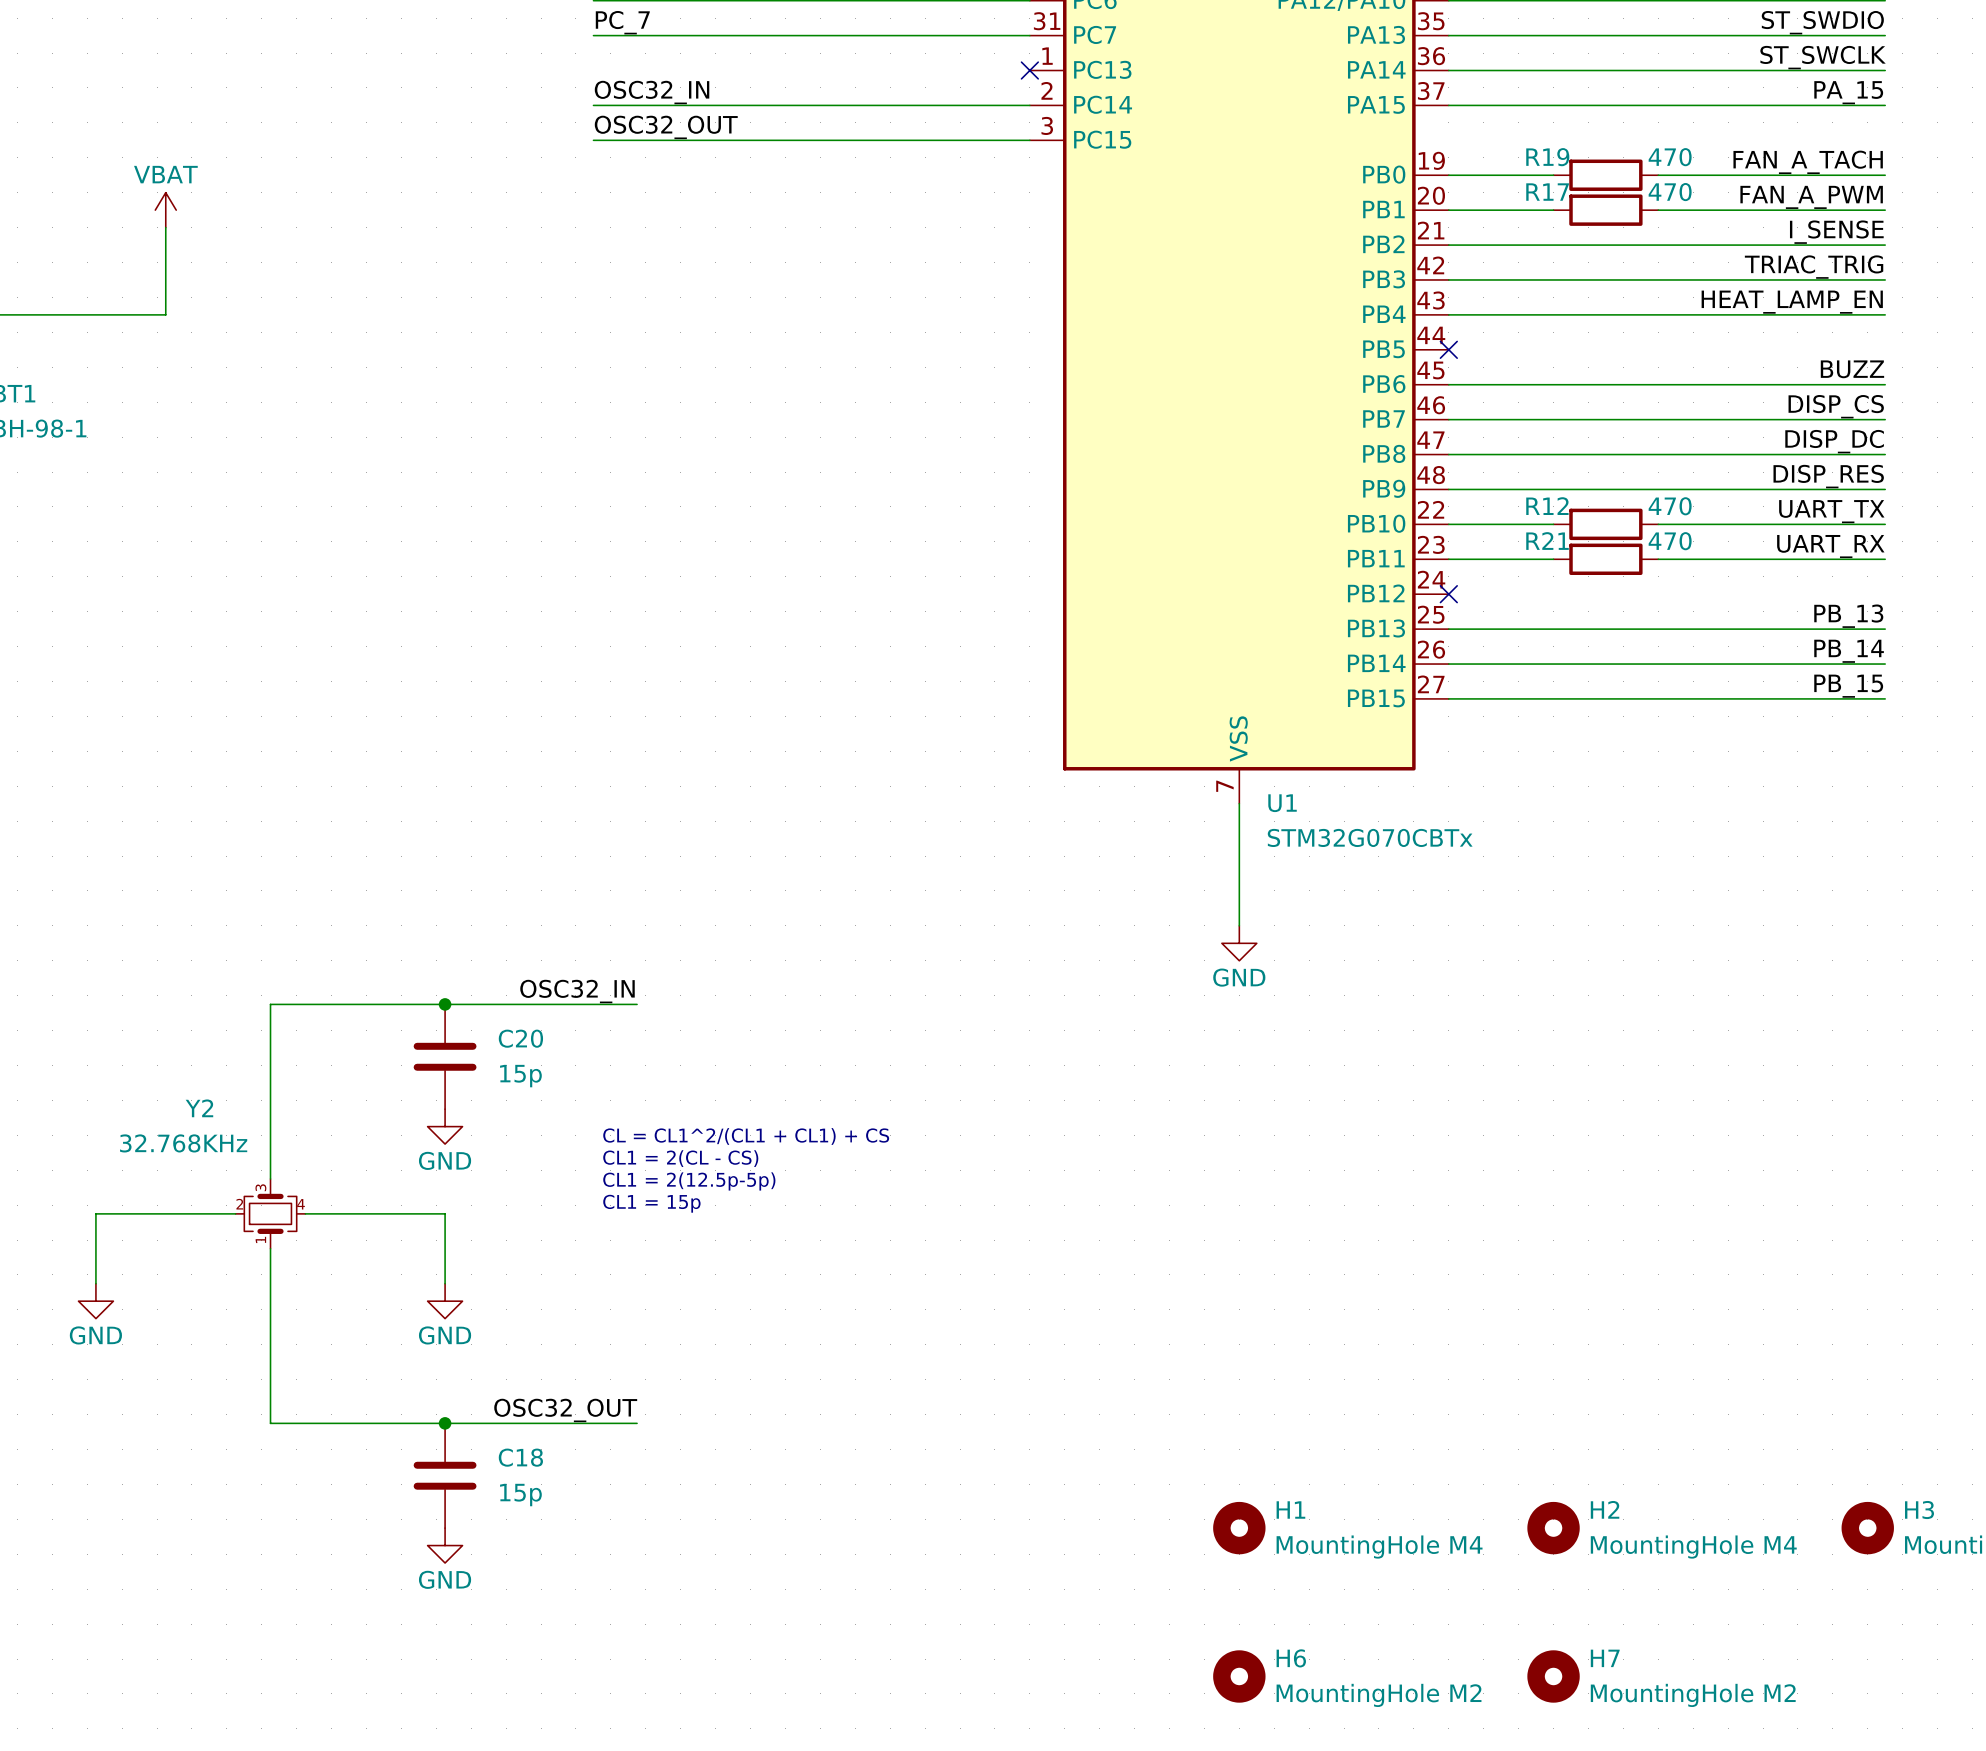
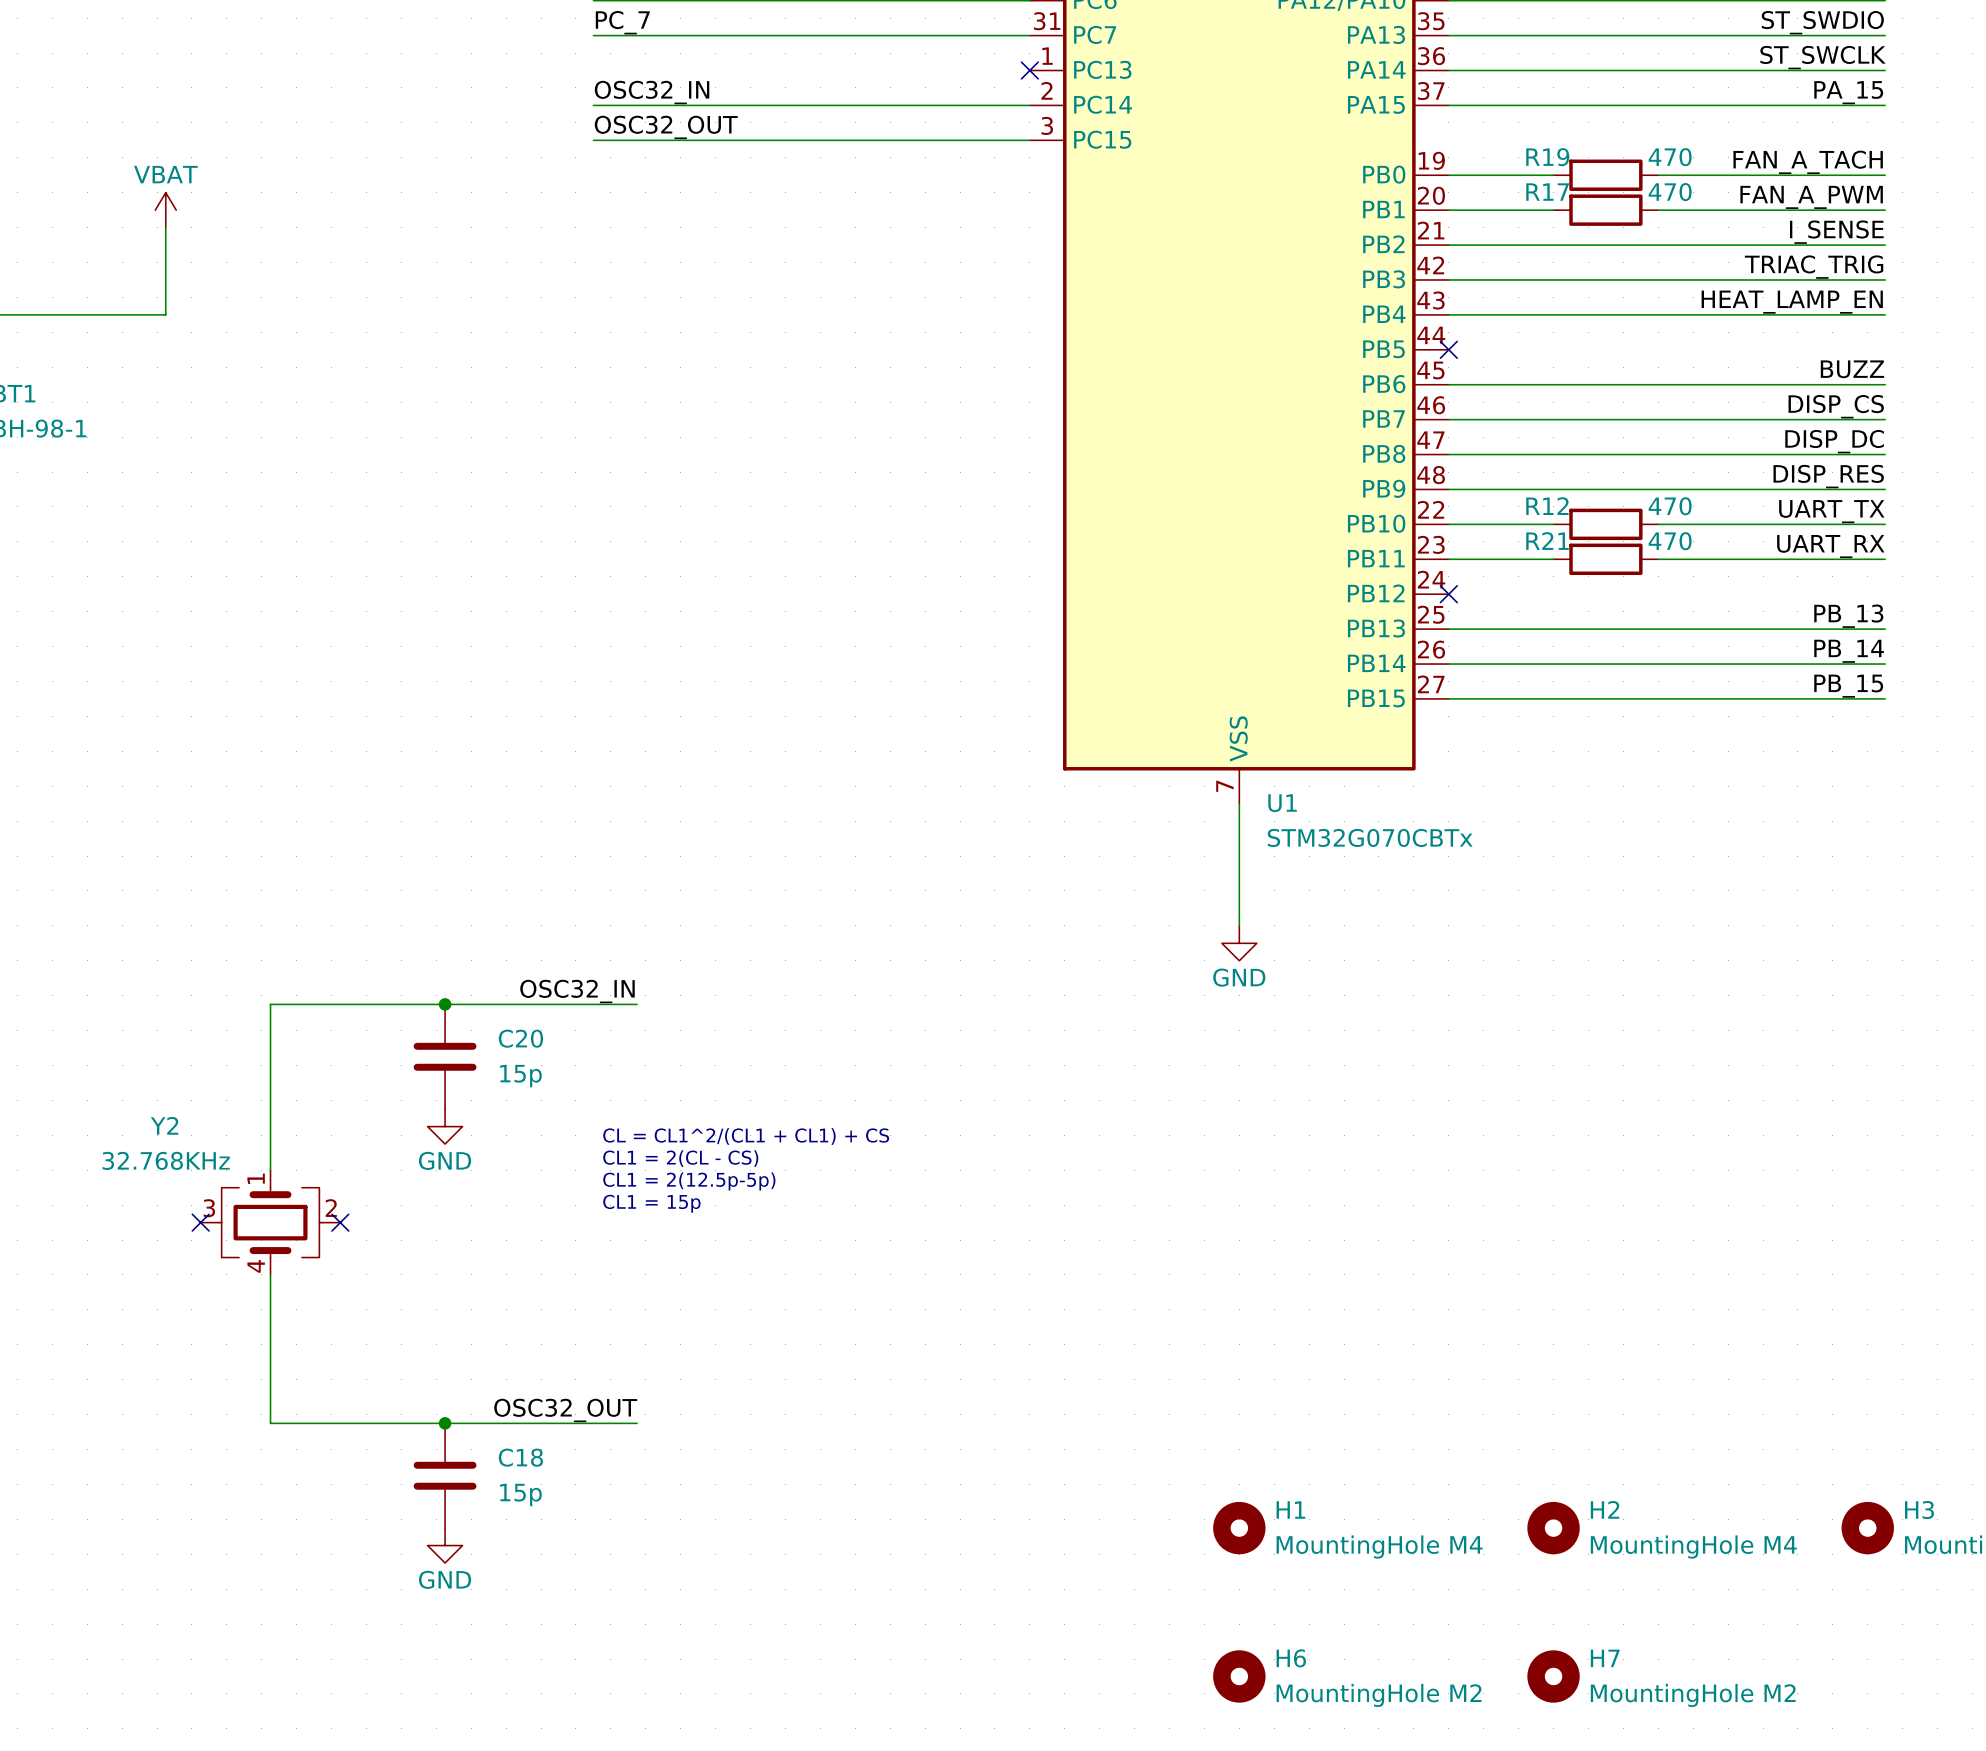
Y2 name position: Y2 (199, 1108) -> Y2 (164, 1125)
Y2 symbol: [235, 1178, 306, 1249] -> [200, 1170, 341, 1275]
wire: (235, 1213) (95, 1213) (95, 1283) -> none
wire: (305, 1213) (445, 1213) (445, 1283) -> none
no-connect mark: none -> (200, 1222)
no-connect mark: none -> (340, 1222)
power symbol: GND (95, 1301) -> none
power symbol: GND (445, 1301) -> none

